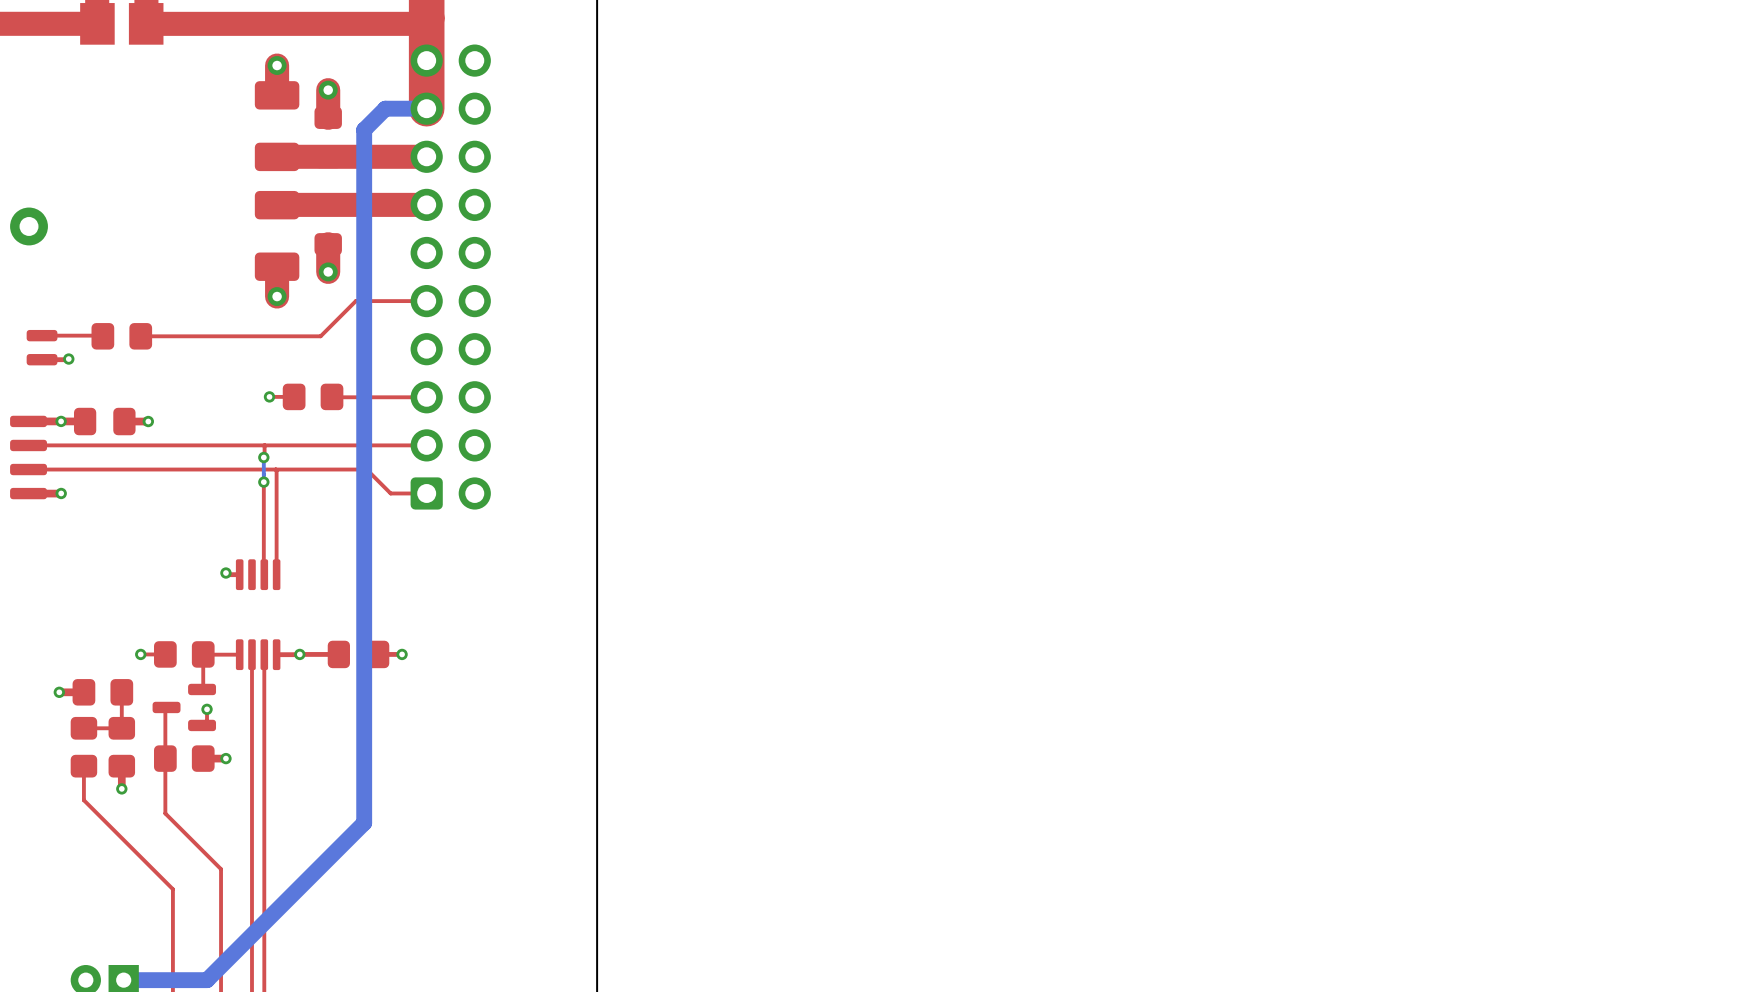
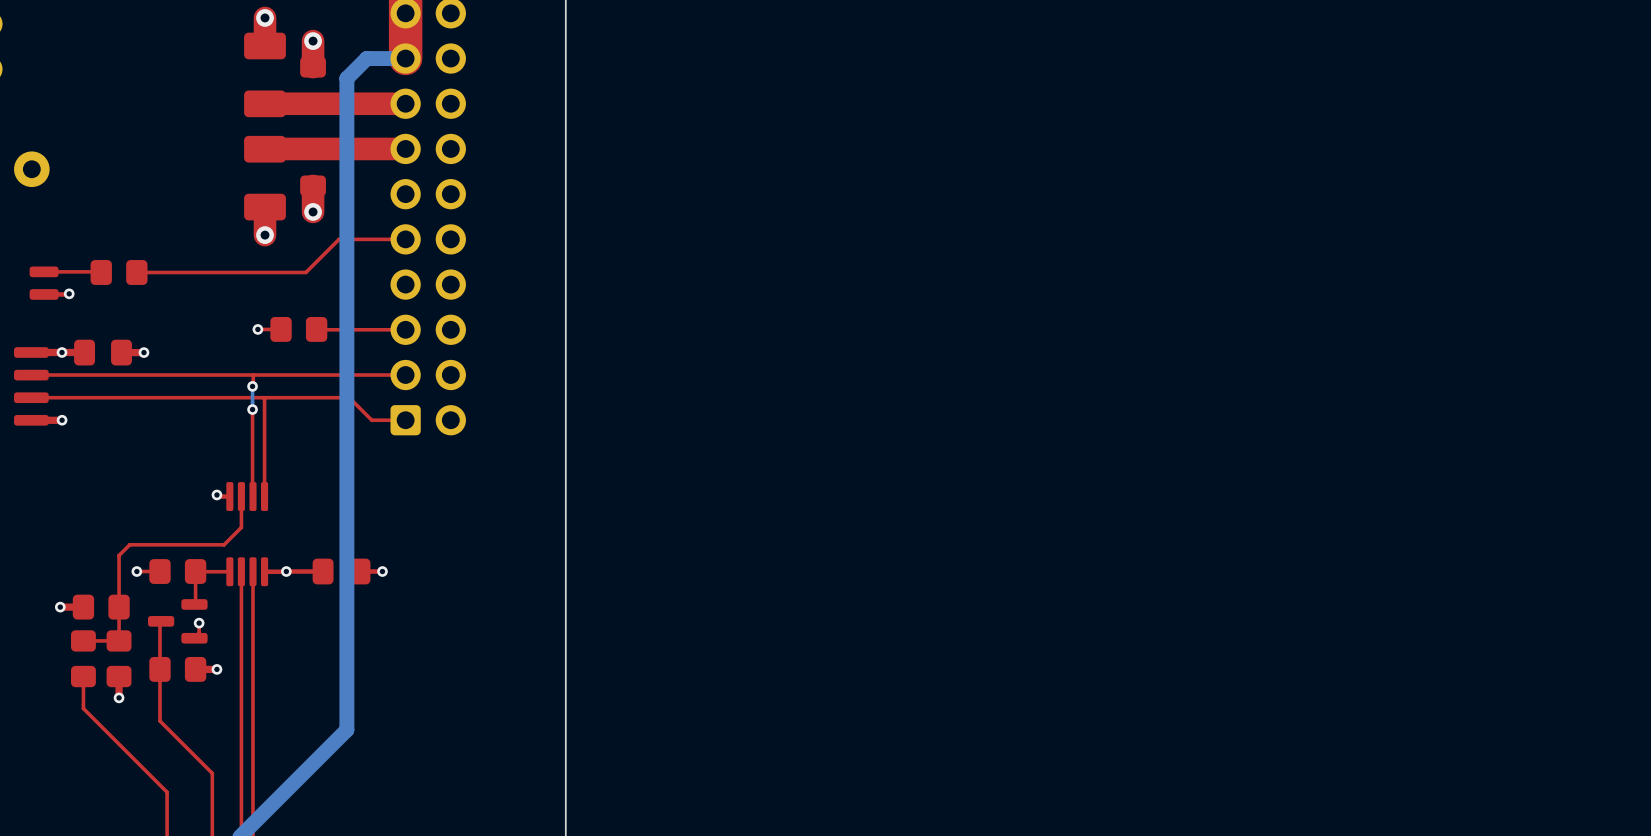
top track: none -> (241, 496) (241, 527) (224, 544) (129, 544) (119, 555) (119, 607)

